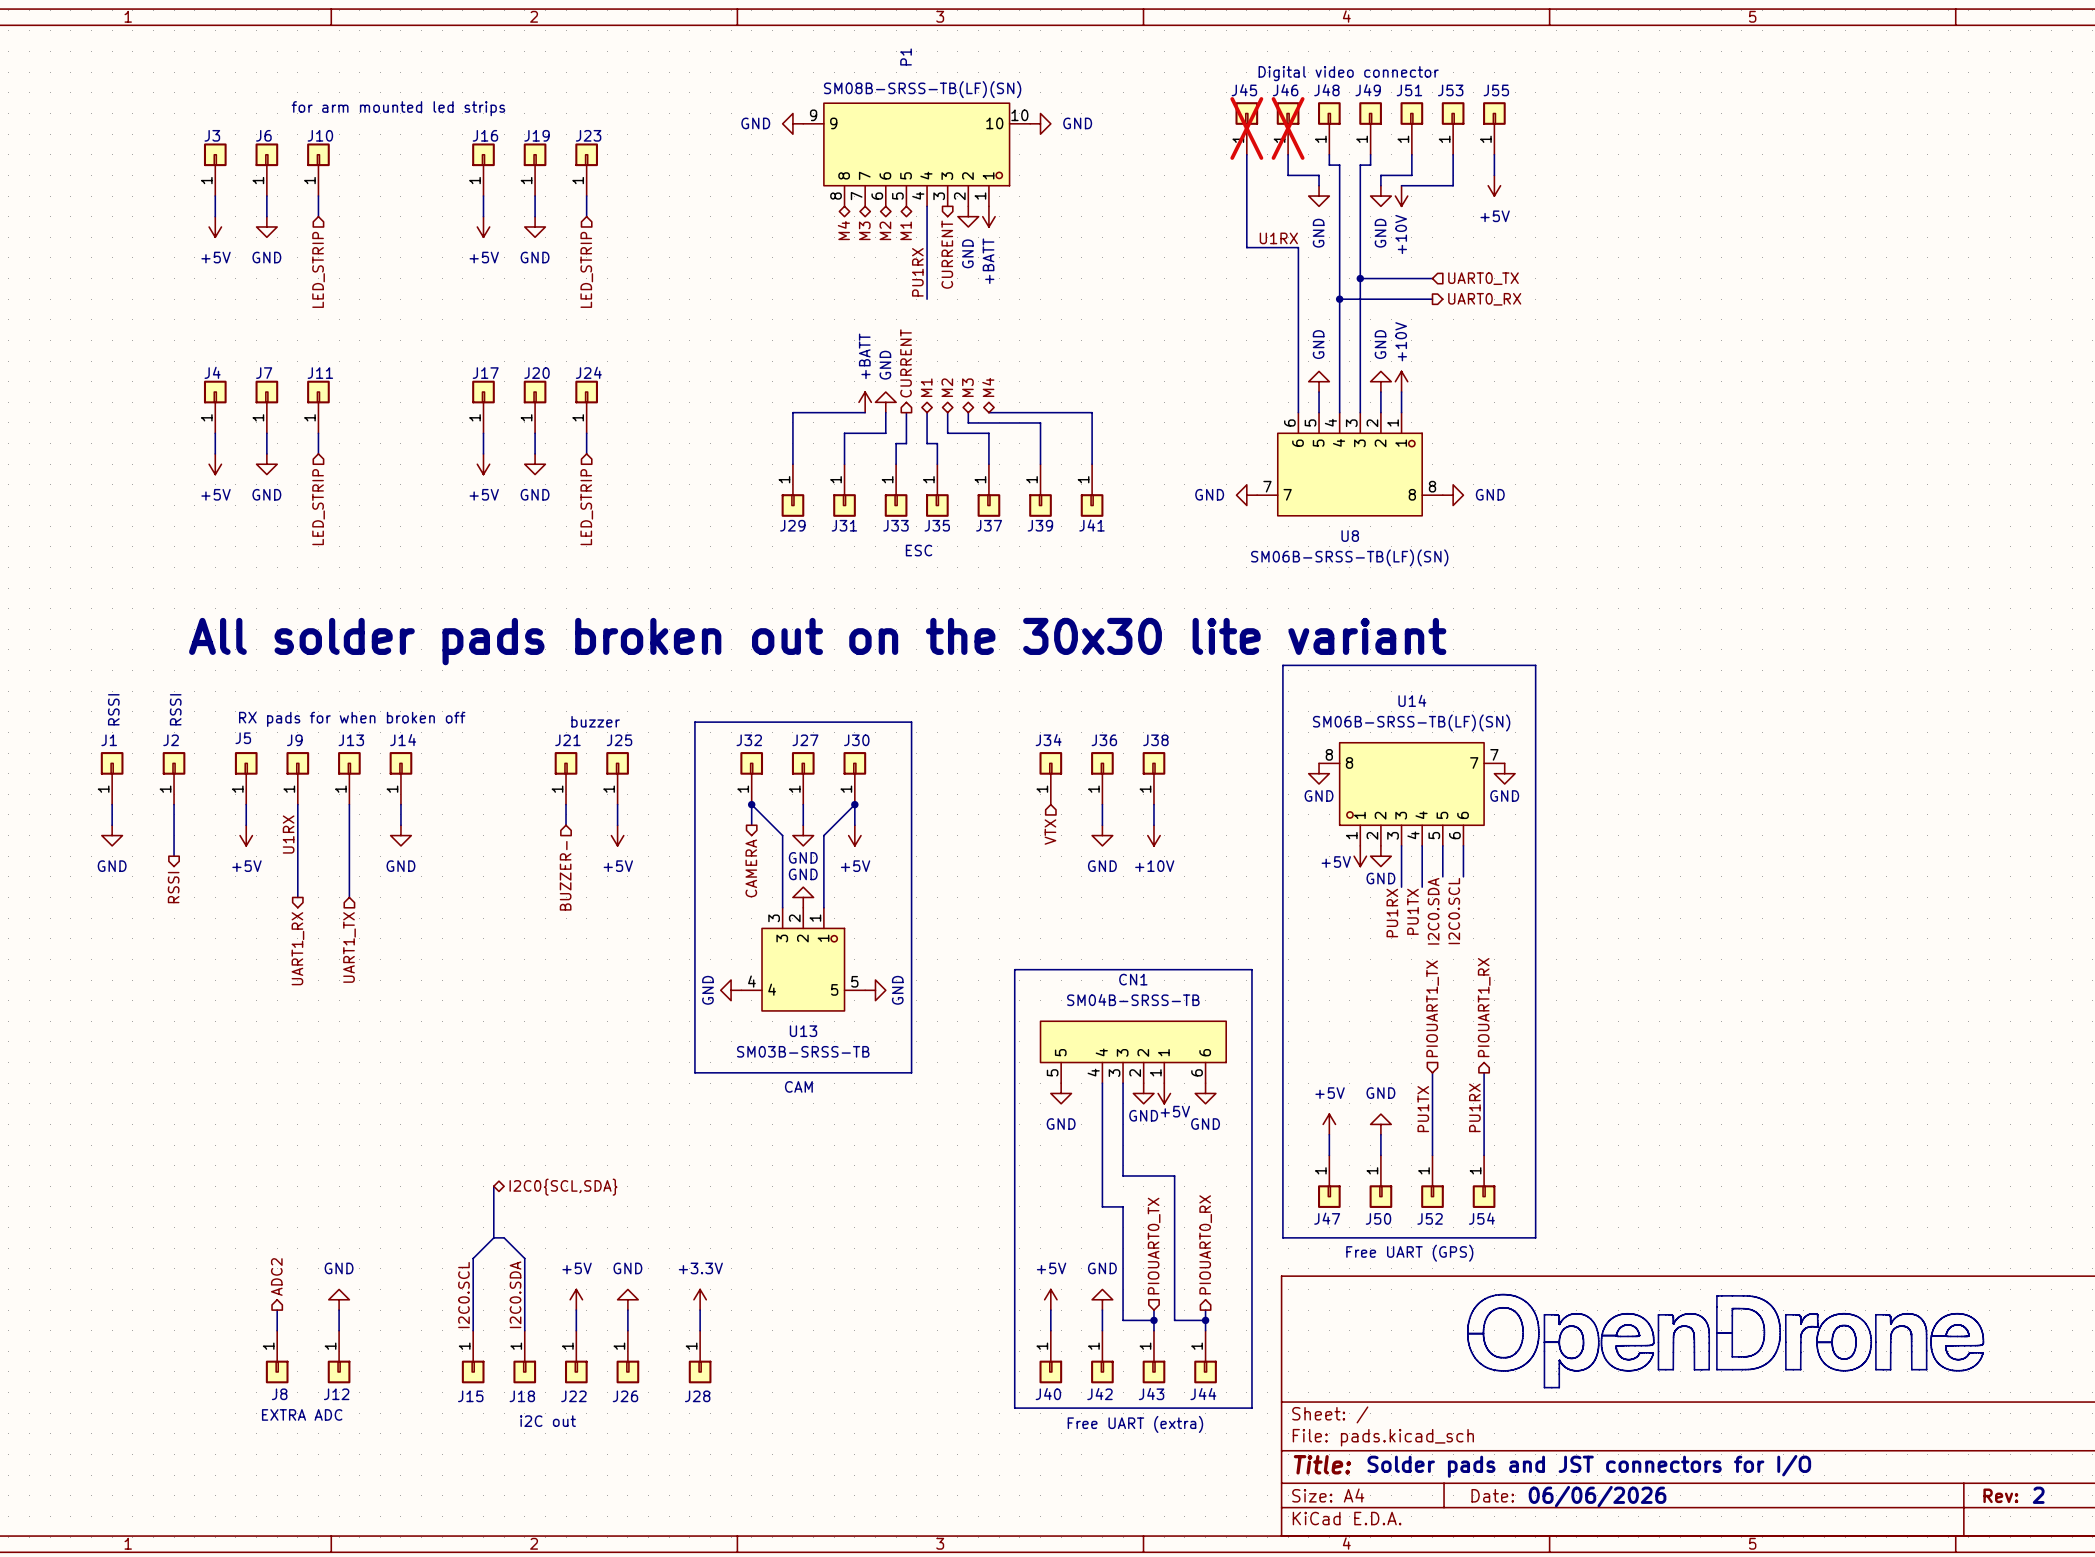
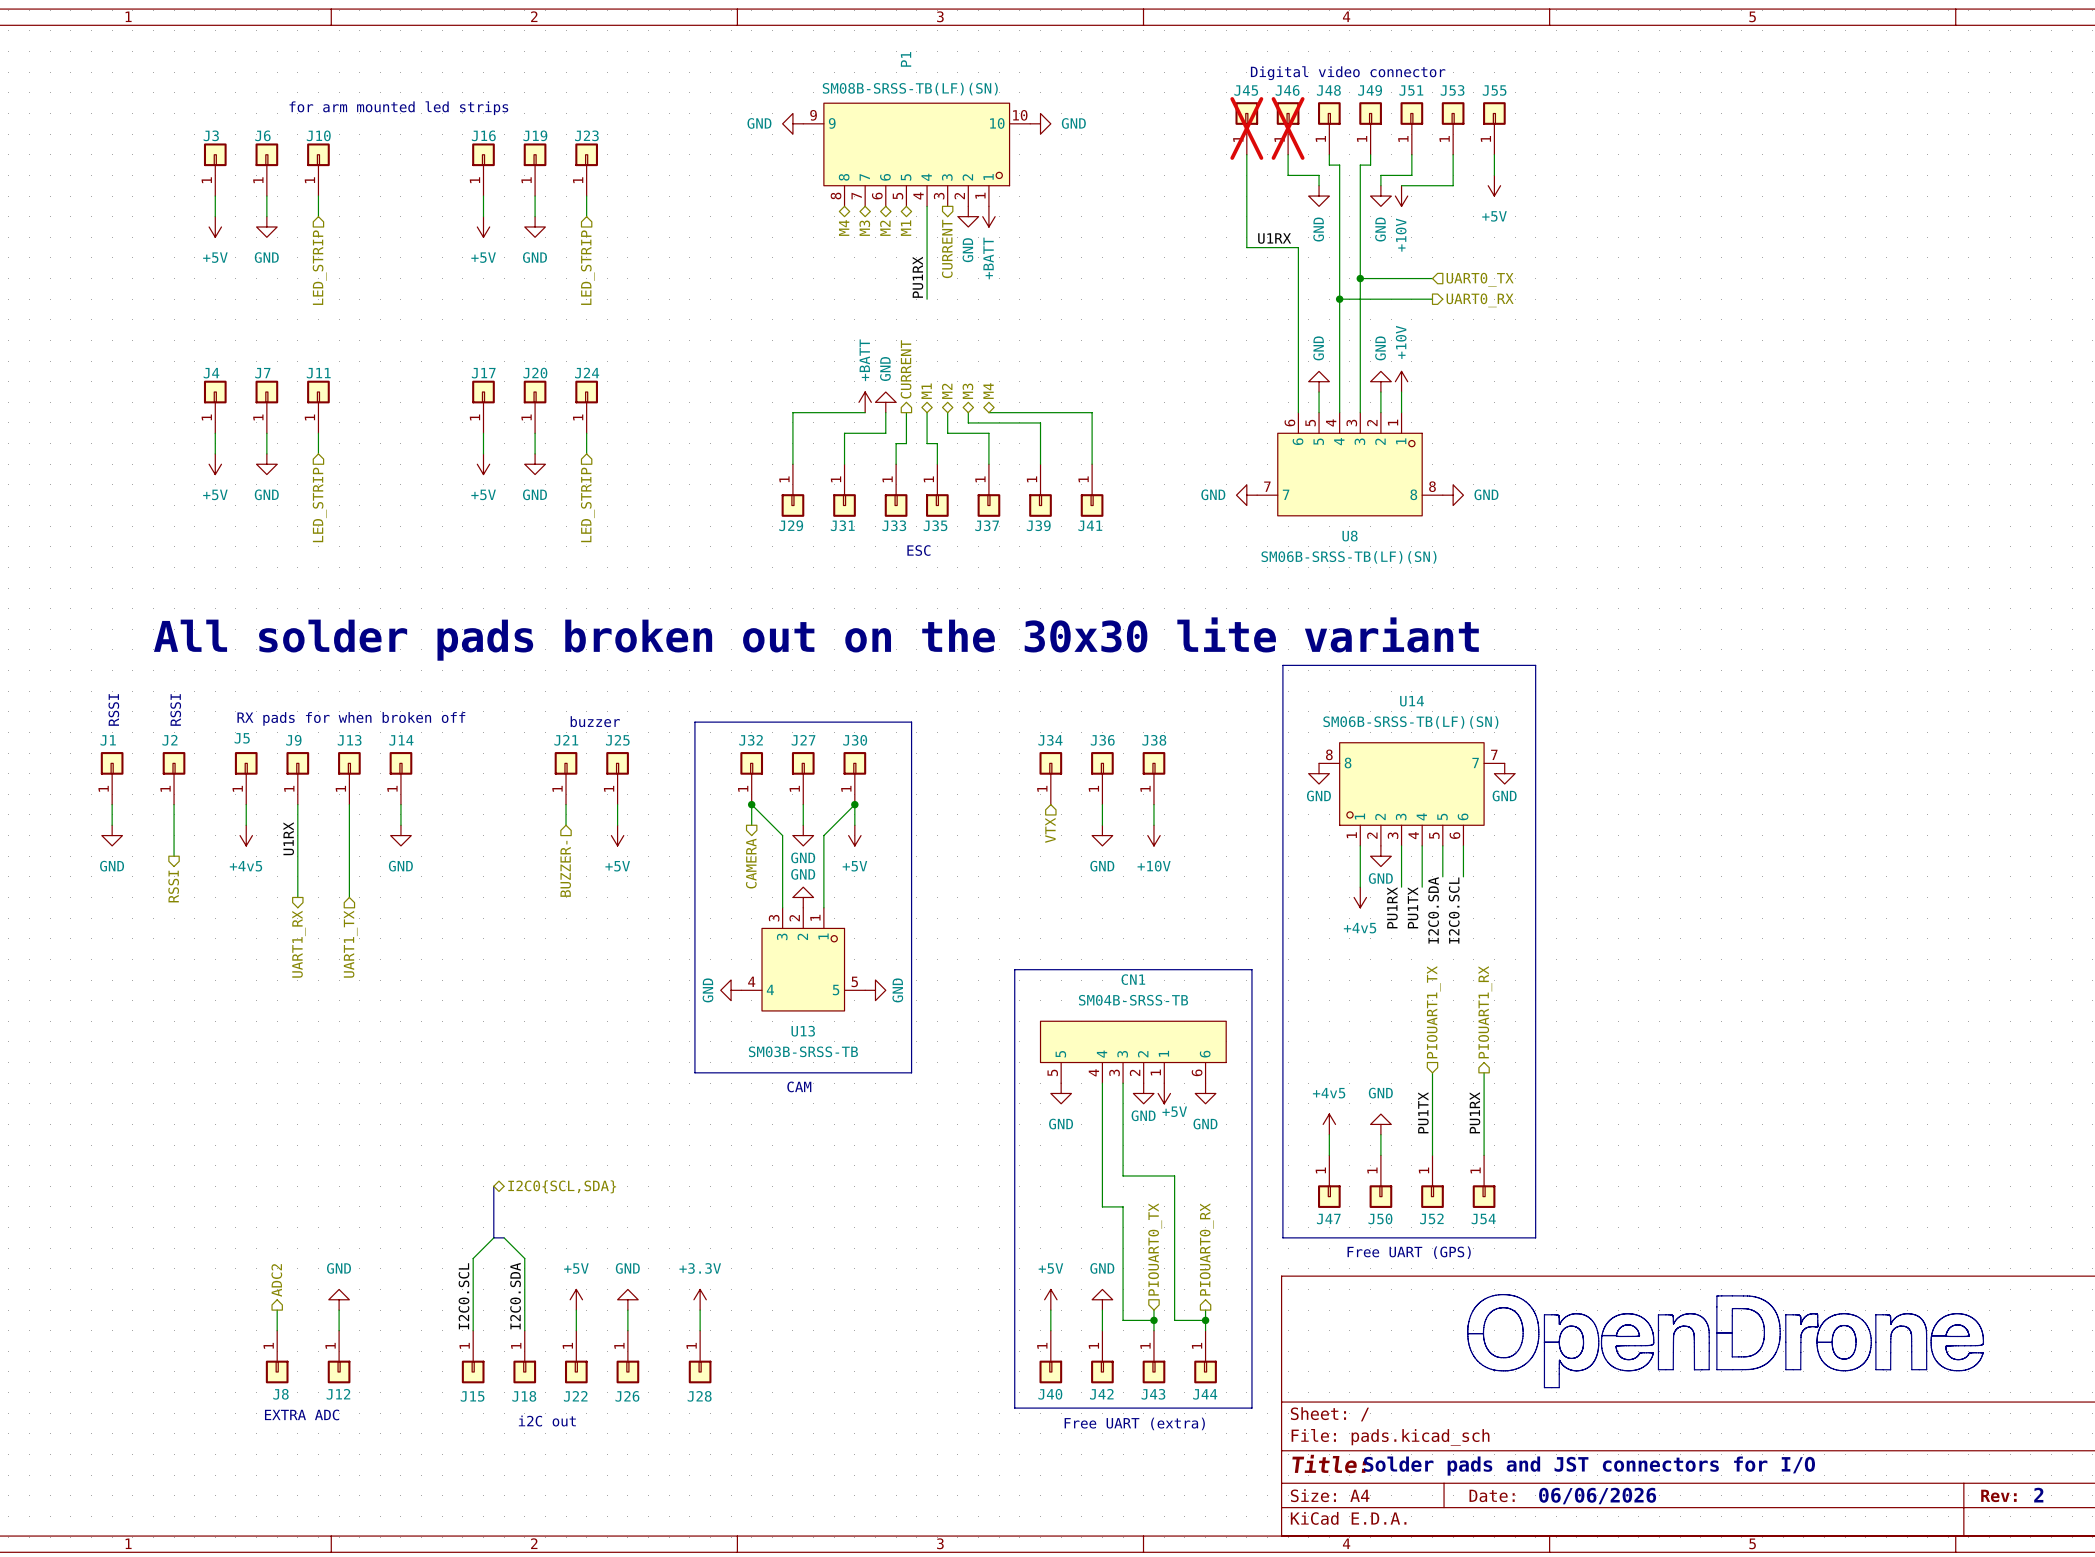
power symbol: +5V (246, 835) -> +4v5 (246, 835)
wire: none -> (1360, 845) (1360, 887)
power symbol: +5V (1360, 856) -> none
power symbol: none -> +4v5 (1360, 897)
power symbol: +5V (1329, 1124) -> +4v5 (1329, 1124)

